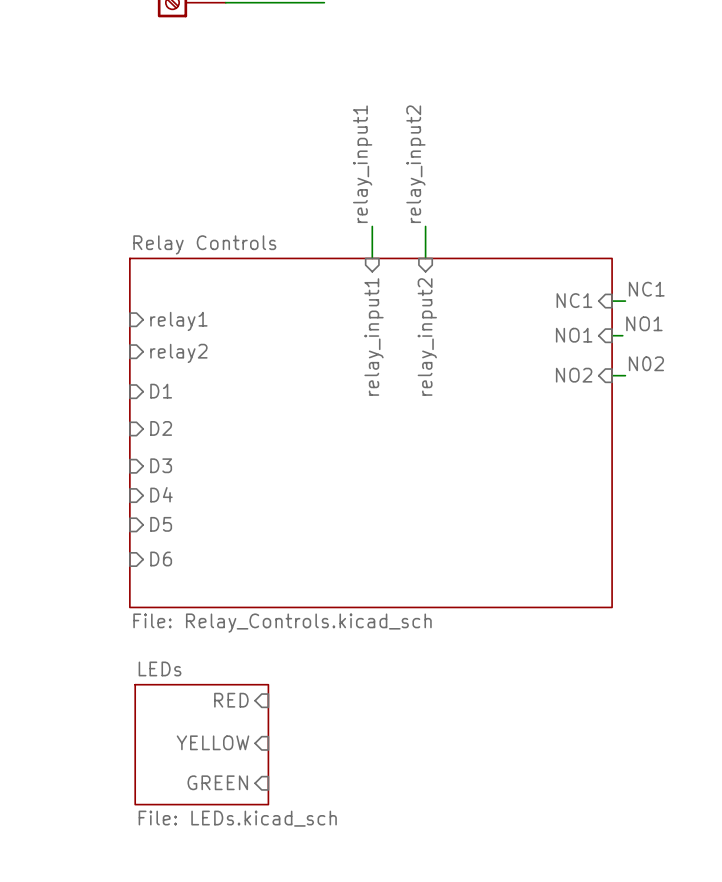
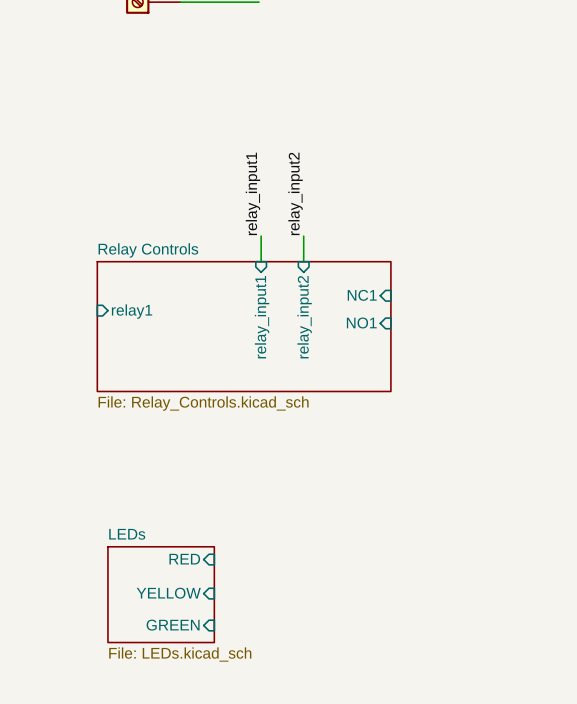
label position: relay_input1 (362, 164) -> relay_input1 (252, 193)
label position: relay_input2 (415, 164) -> relay_input2 (295, 193)
wire: (372, 226) (372, 258) -> (261, 236) (261, 261)
wire: (425, 226) (425, 258) -> (303, 236) (303, 261)
label: NC1 (646, 289) -> none
sheet pin position: NC1 (574, 300) -> NC1 (362, 295)
wire: (612, 301) (625, 301) -> none
sheet pin position: relay1 (178, 321) -> relay1 (132, 311)
label: NO1 (644, 323) -> none
sheet pin position: NO1 (574, 335) -> NO1 (361, 323)
wire: (612, 335) (622, 335) -> none
sheet pin position: relay_input1 (374, 336) -> relay_input1 (262, 317)
sheet pin position: relay_input2 (427, 336) -> relay_input2 (304, 317)
sheet pin: relay2 (178, 353) -> none
label: N02 (646, 363) -> none
sheet pin: NO2 (574, 375) -> none
wire: (612, 375) (625, 375) -> none
sheet pin: D1 (161, 391) -> none
sheet Relay Controls: none -> File: Relay_Controls.kicad_sch (244, 326)
sheet pin: D2 (161, 428) -> none
sheet Relay Controls: File: Relay_Controls.kicad_sch (370, 432) -> none
sheet pin: D3 (161, 465) -> none
sheet pin: D4 (161, 494) -> none
sheet pin: D5 (161, 524) -> none
sheet pin: D6 (161, 559) -> none

